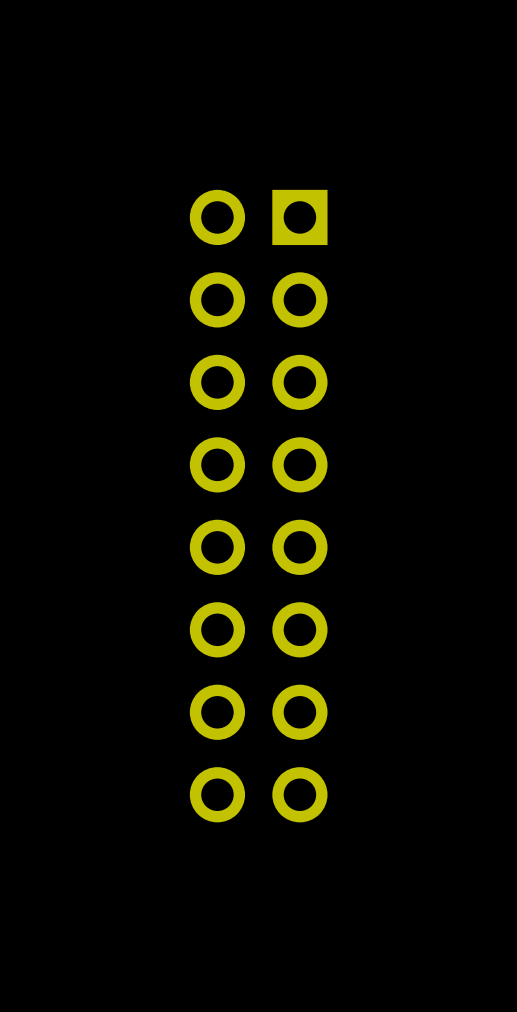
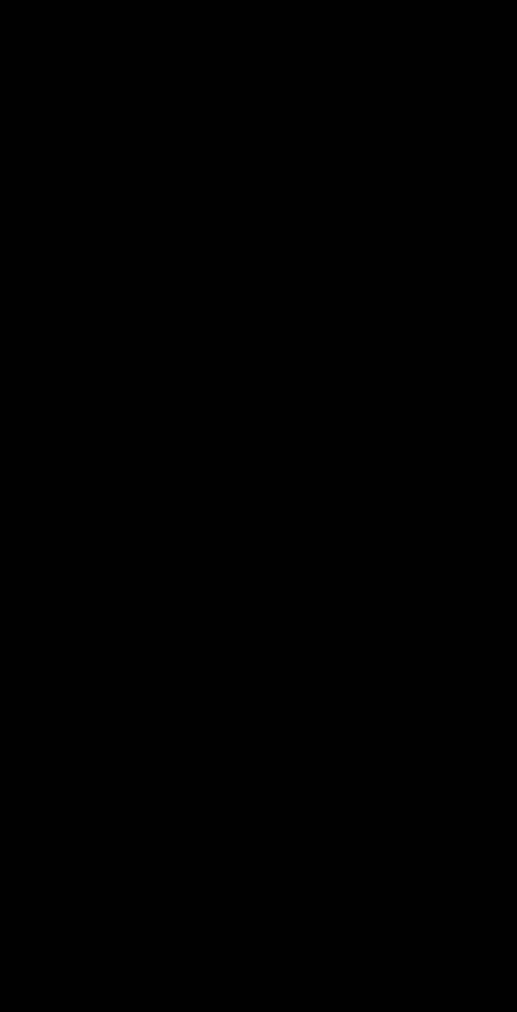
part: (258, 506) -> none

